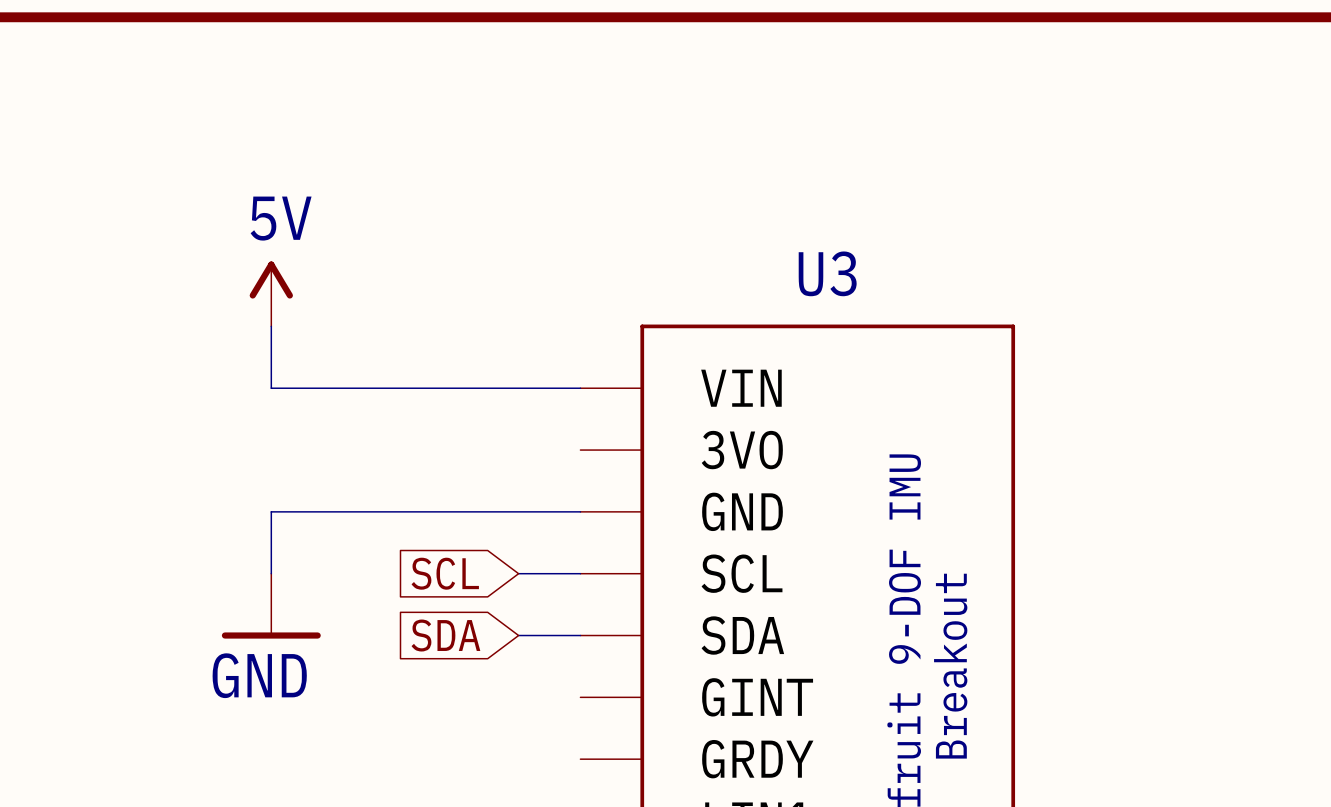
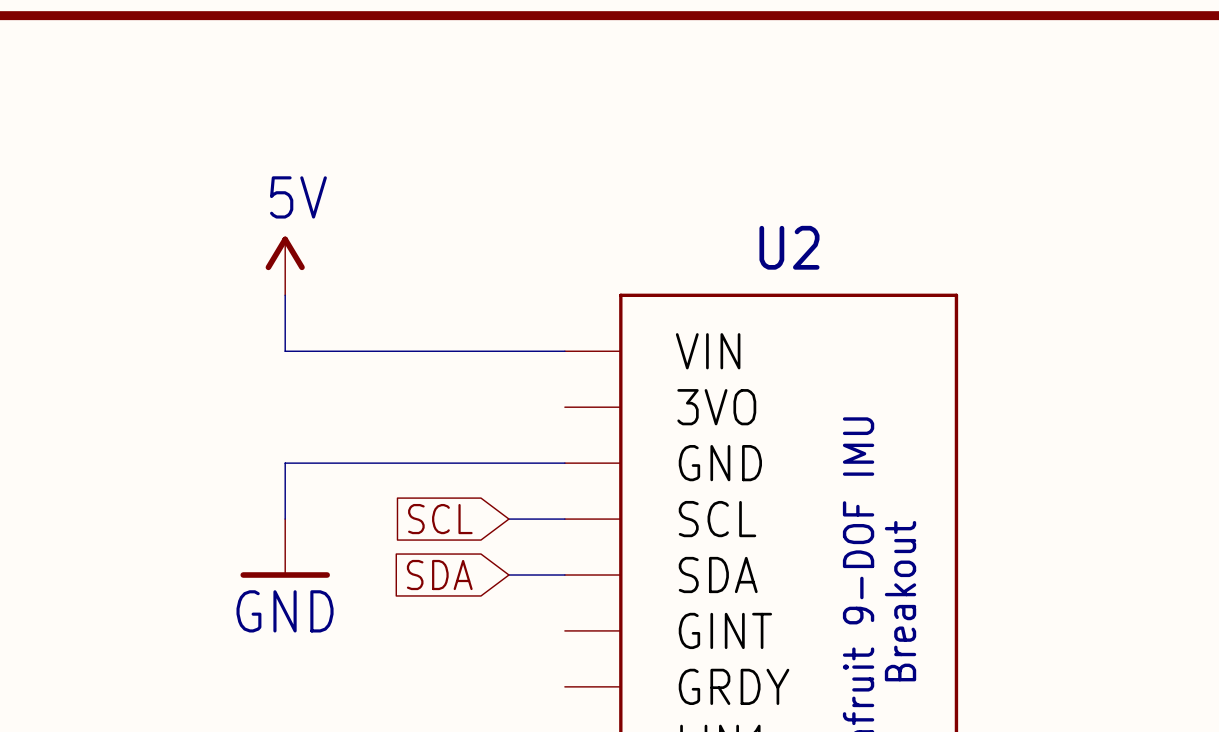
U3 name: U3 (827, 273) -> U2 (789, 247)

